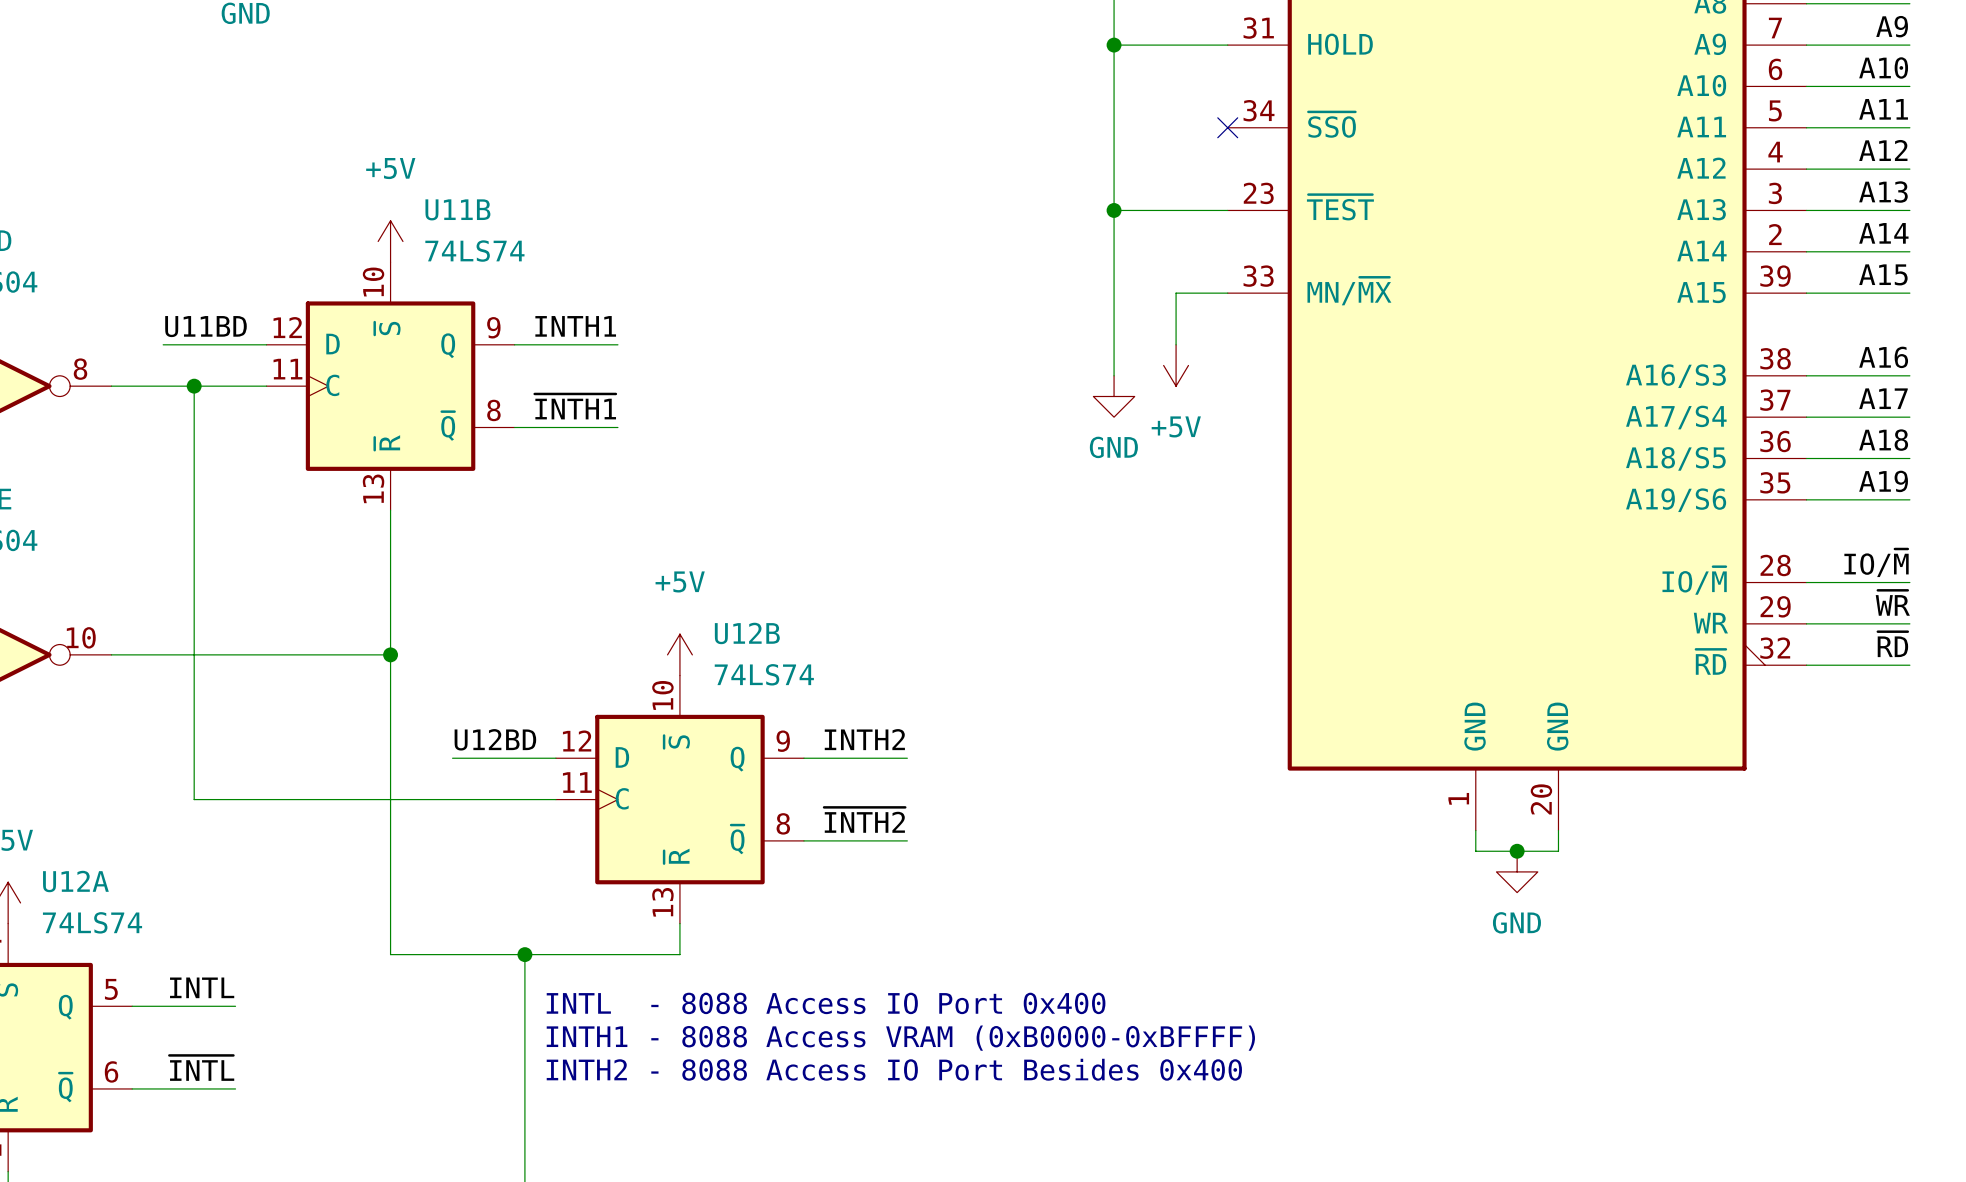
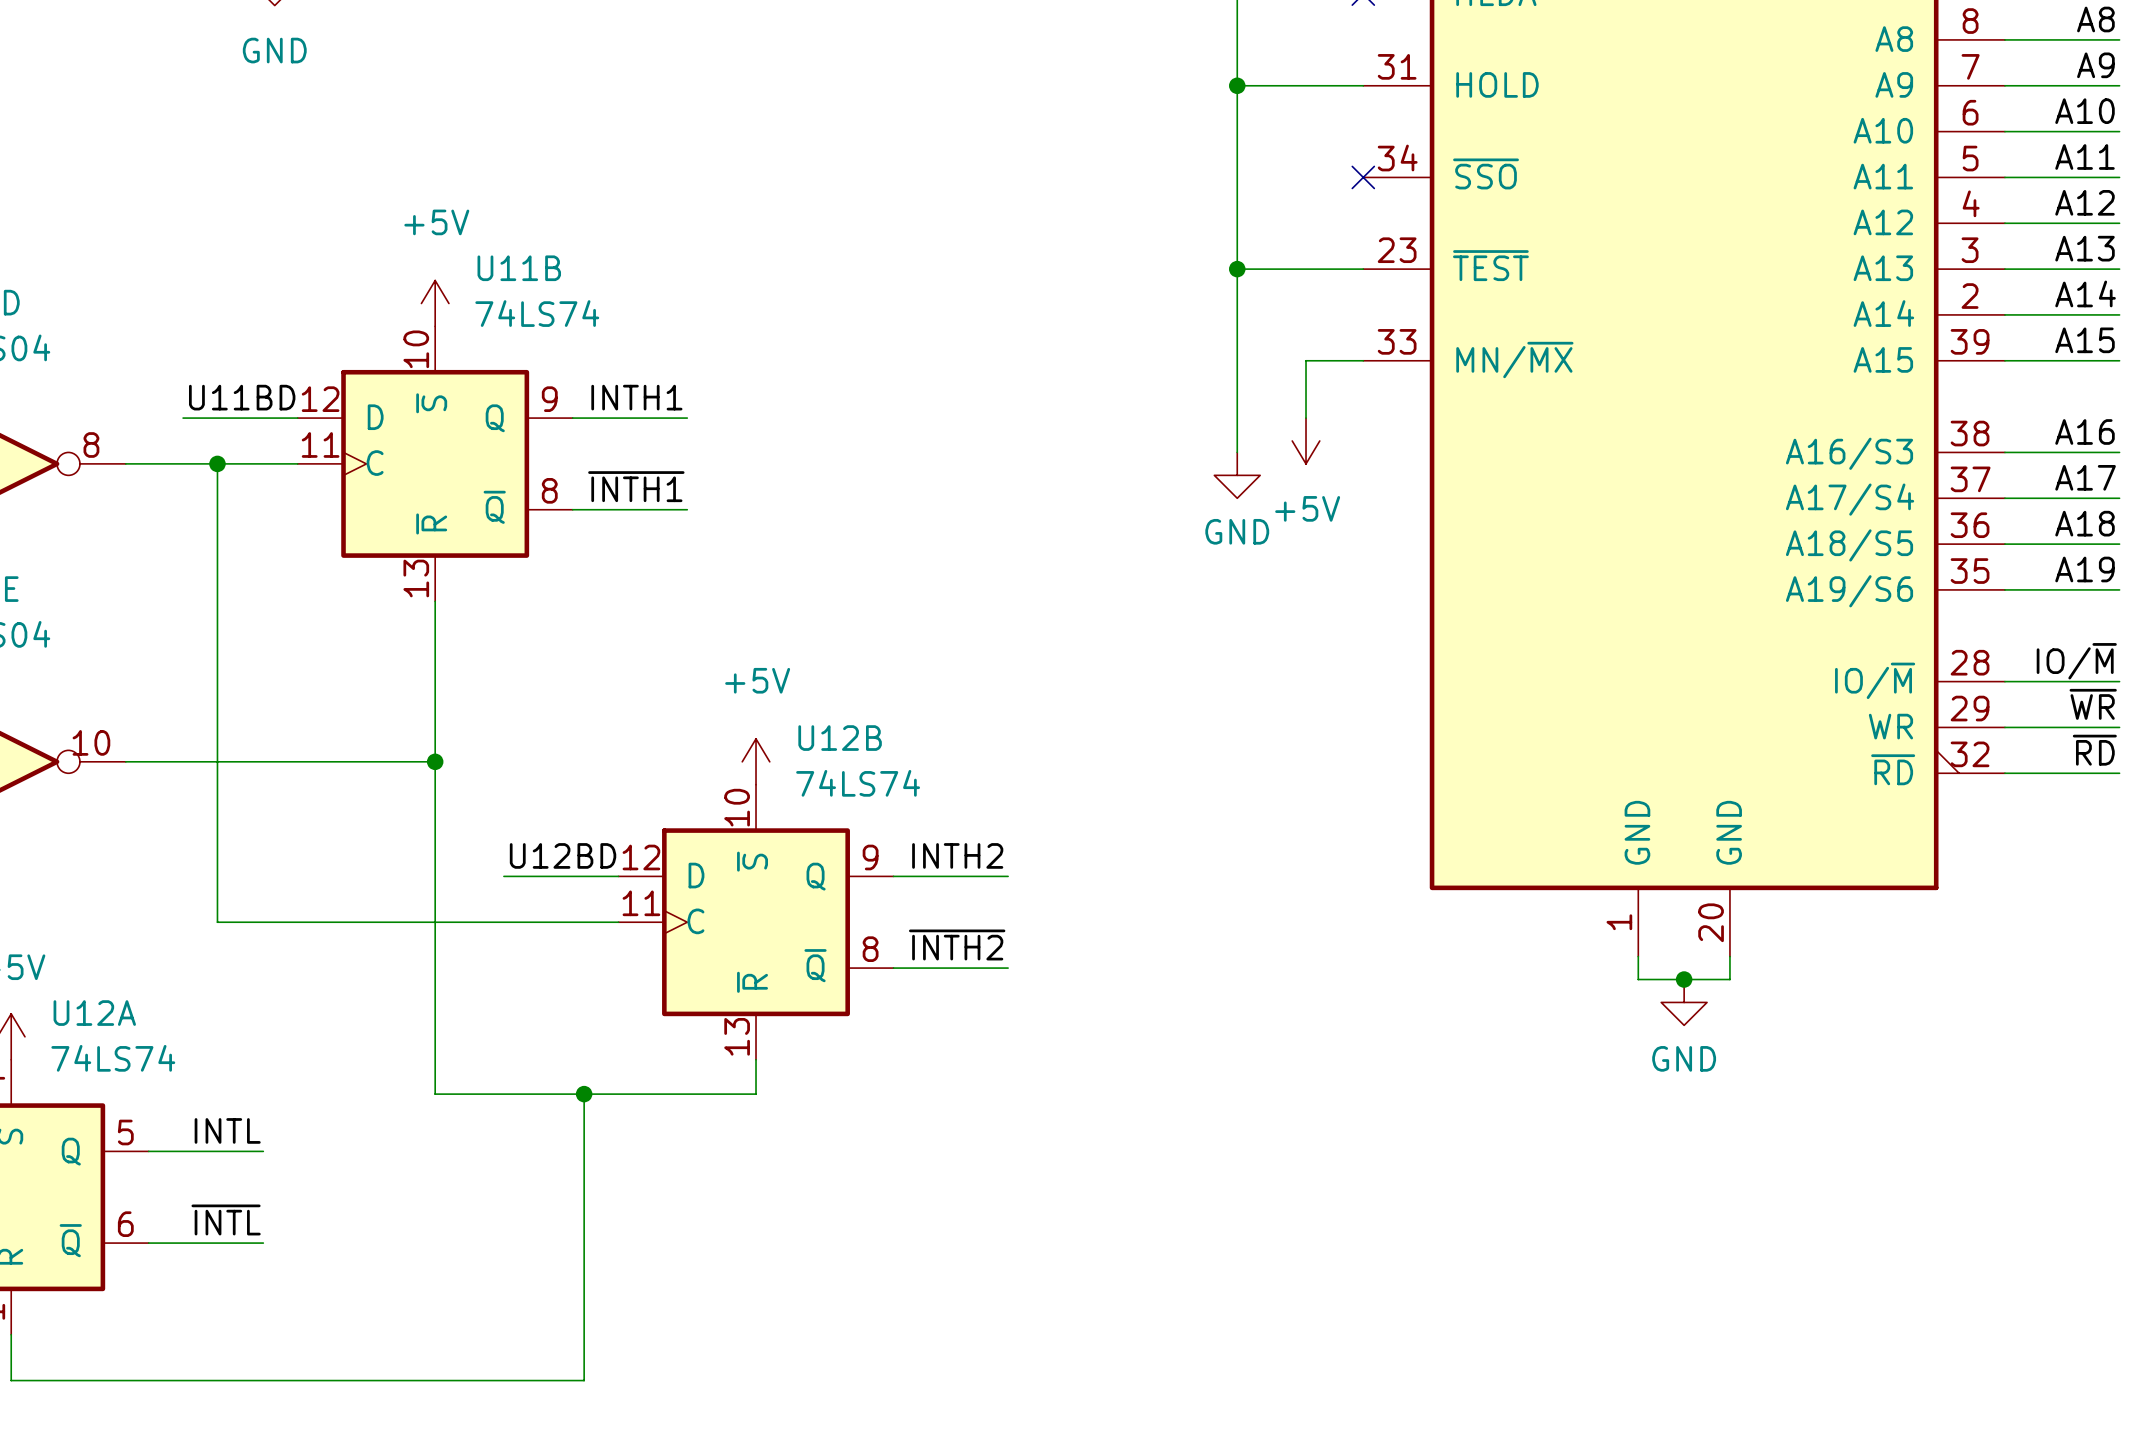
text: INTL - 8088 Access IO Port 0x400 (826, 1003) -> none
text: INTH1 - 8088 Access VRAM (0xB0000-0xBFFFF) (900, 1038) -> none
text: INTH2 - 8088 Access IO Port Besides 0x400 (894, 1069) -> none

